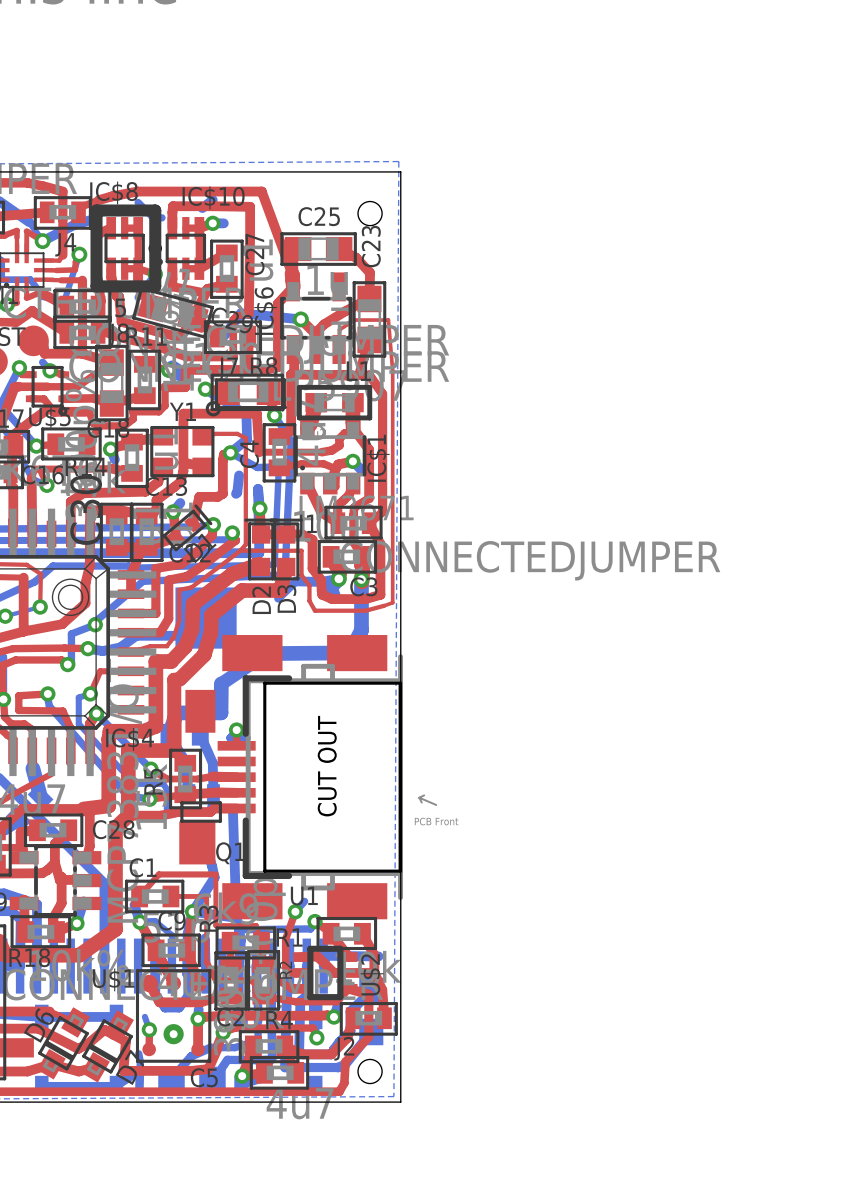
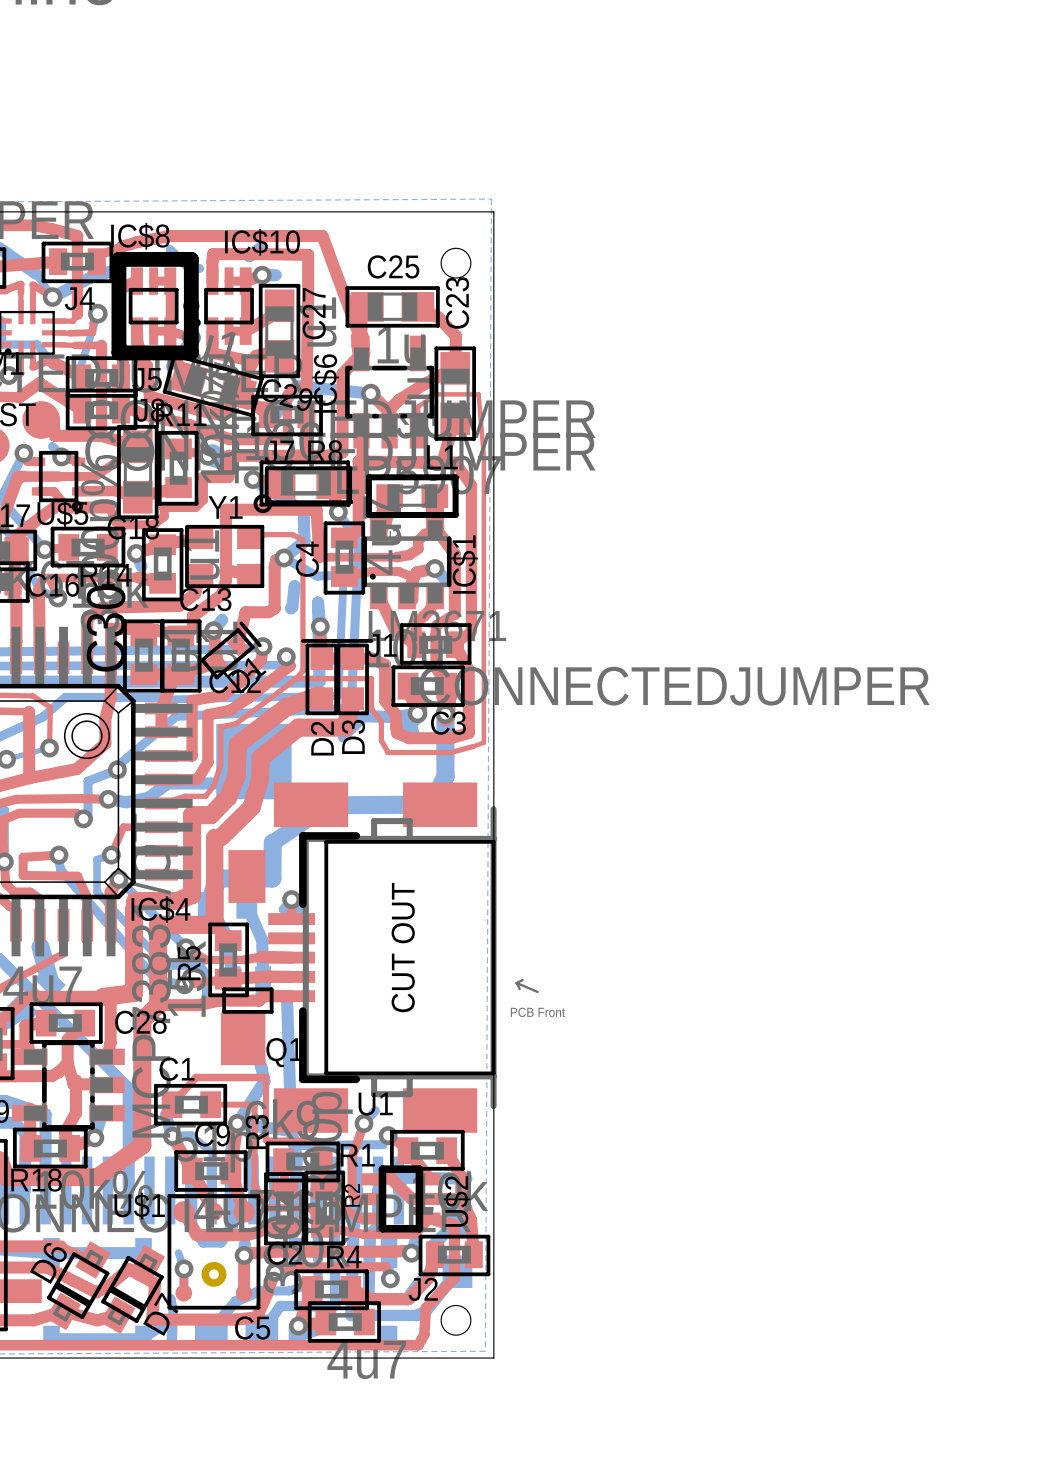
C27 footprint: [210, 239, 244, 299] -> [258, 283, 301, 379]

